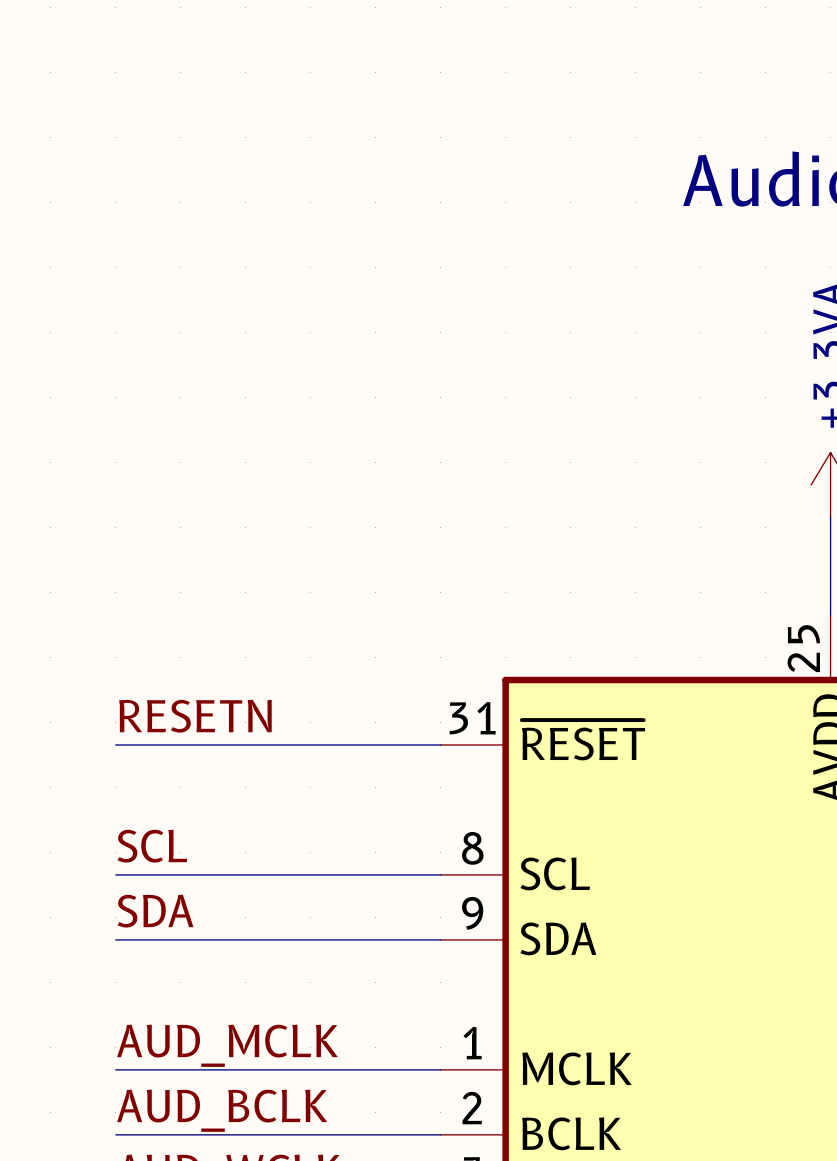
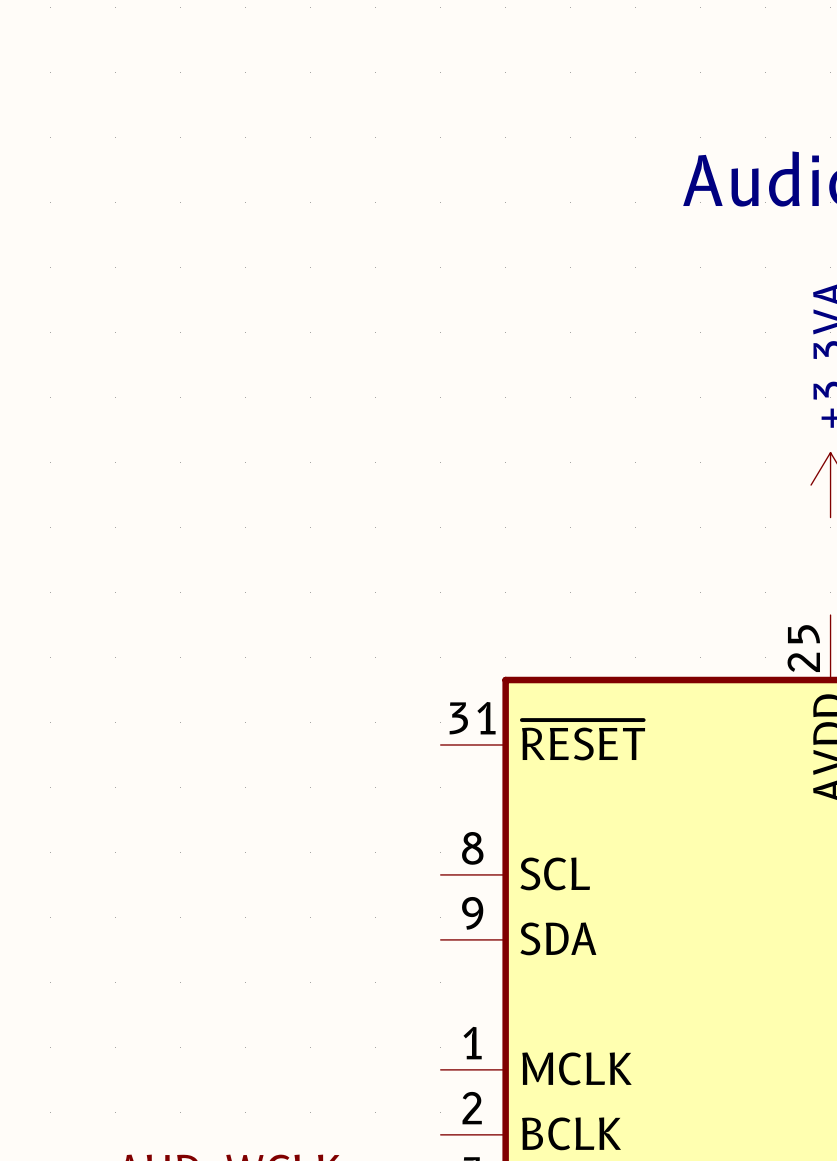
wire: (830, 517) (830, 615) -> none
label: RESETN (195, 716) -> none
wire: (115, 744) (440, 744) -> none
label: SCL (152, 846) -> none
wire: (115, 874) (440, 874) -> none
label: SDA (155, 911) -> none
wire: (115, 939) (440, 939) -> none
label: AUD_MCLK (227, 1045) -> none
wire: (115, 1069) (440, 1069) -> none
label: AUD_BCLK (222, 1110) -> none
wire: (115, 1134) (440, 1134) -> none

